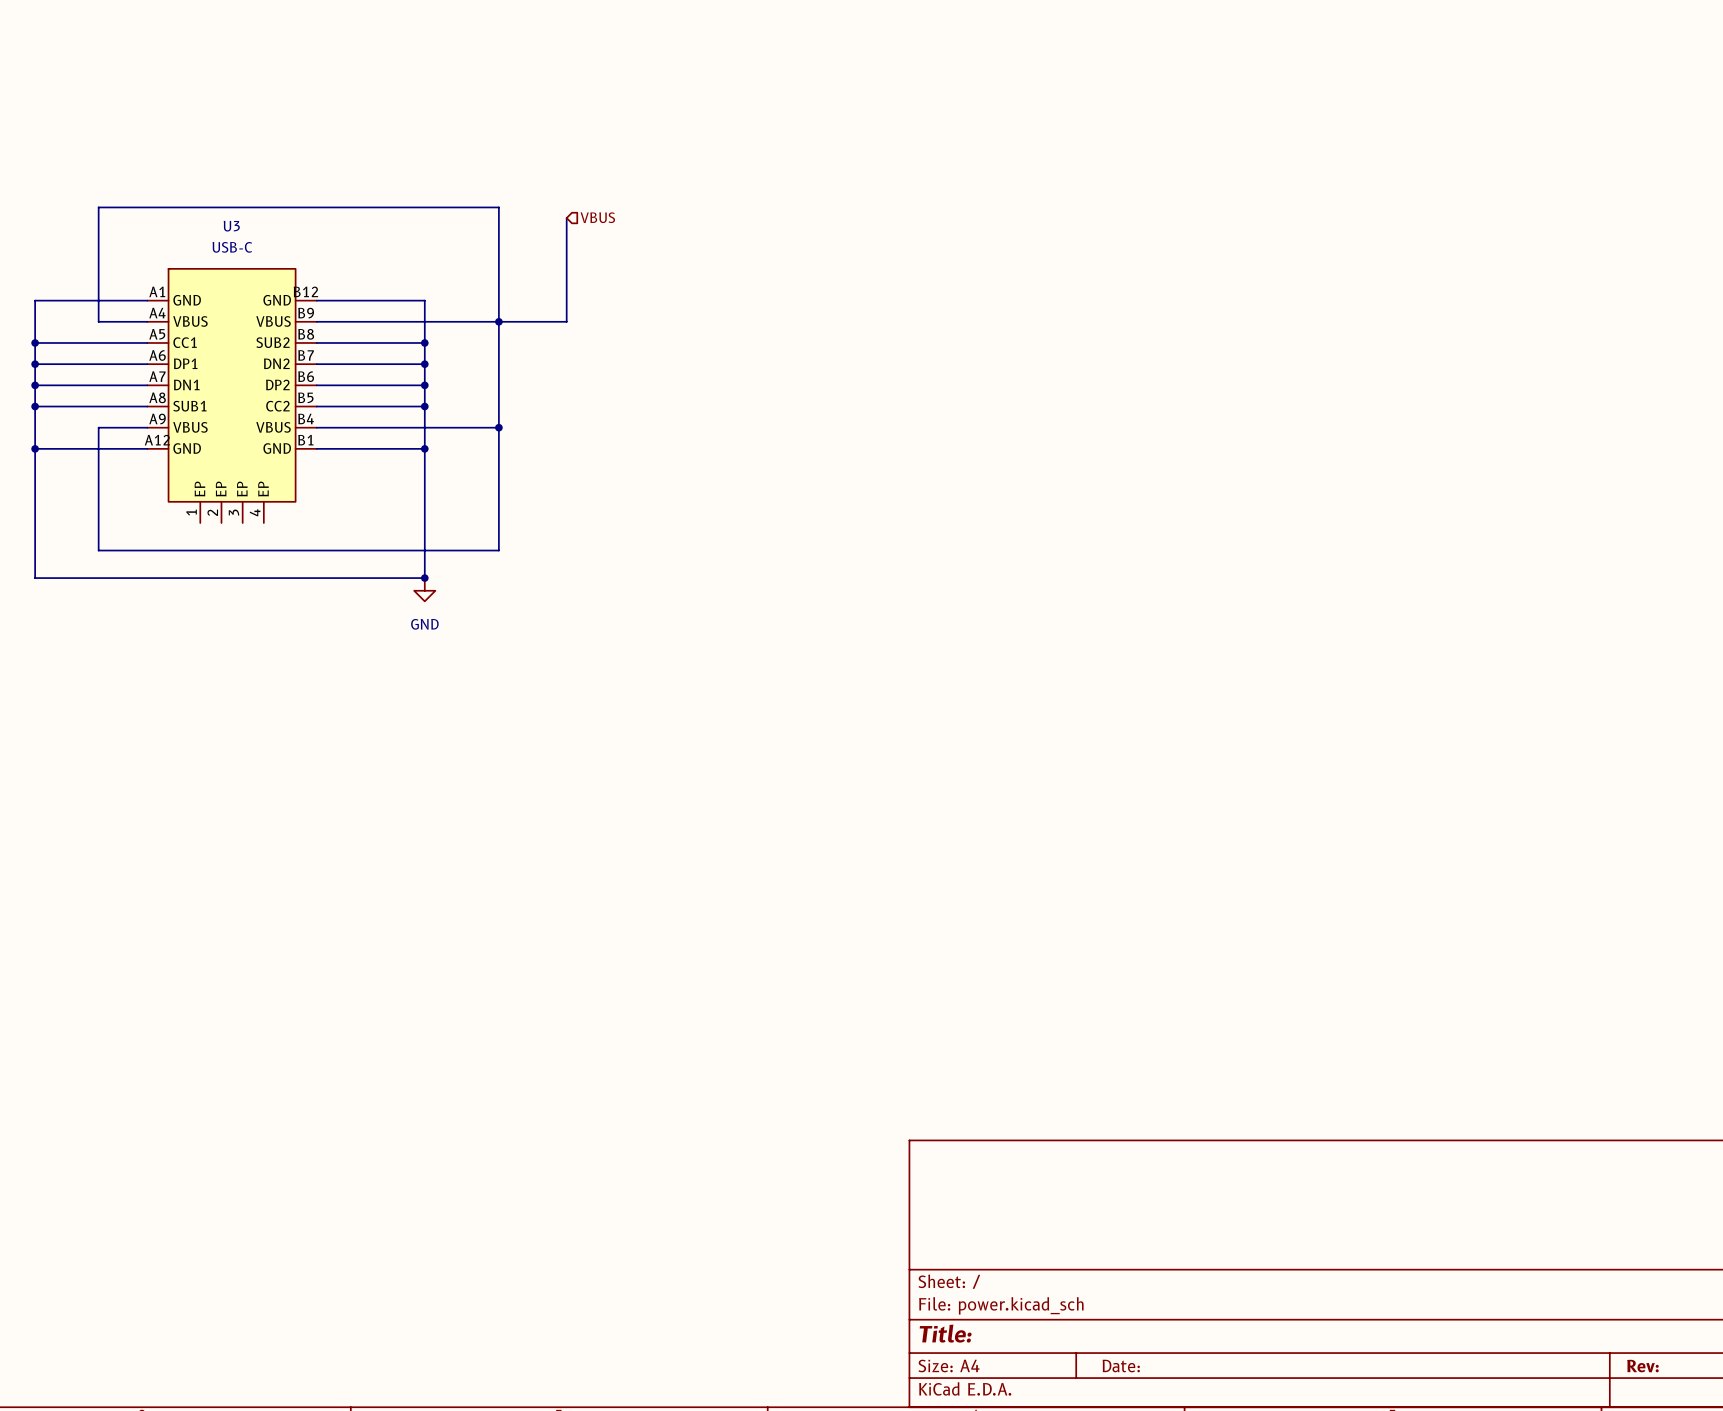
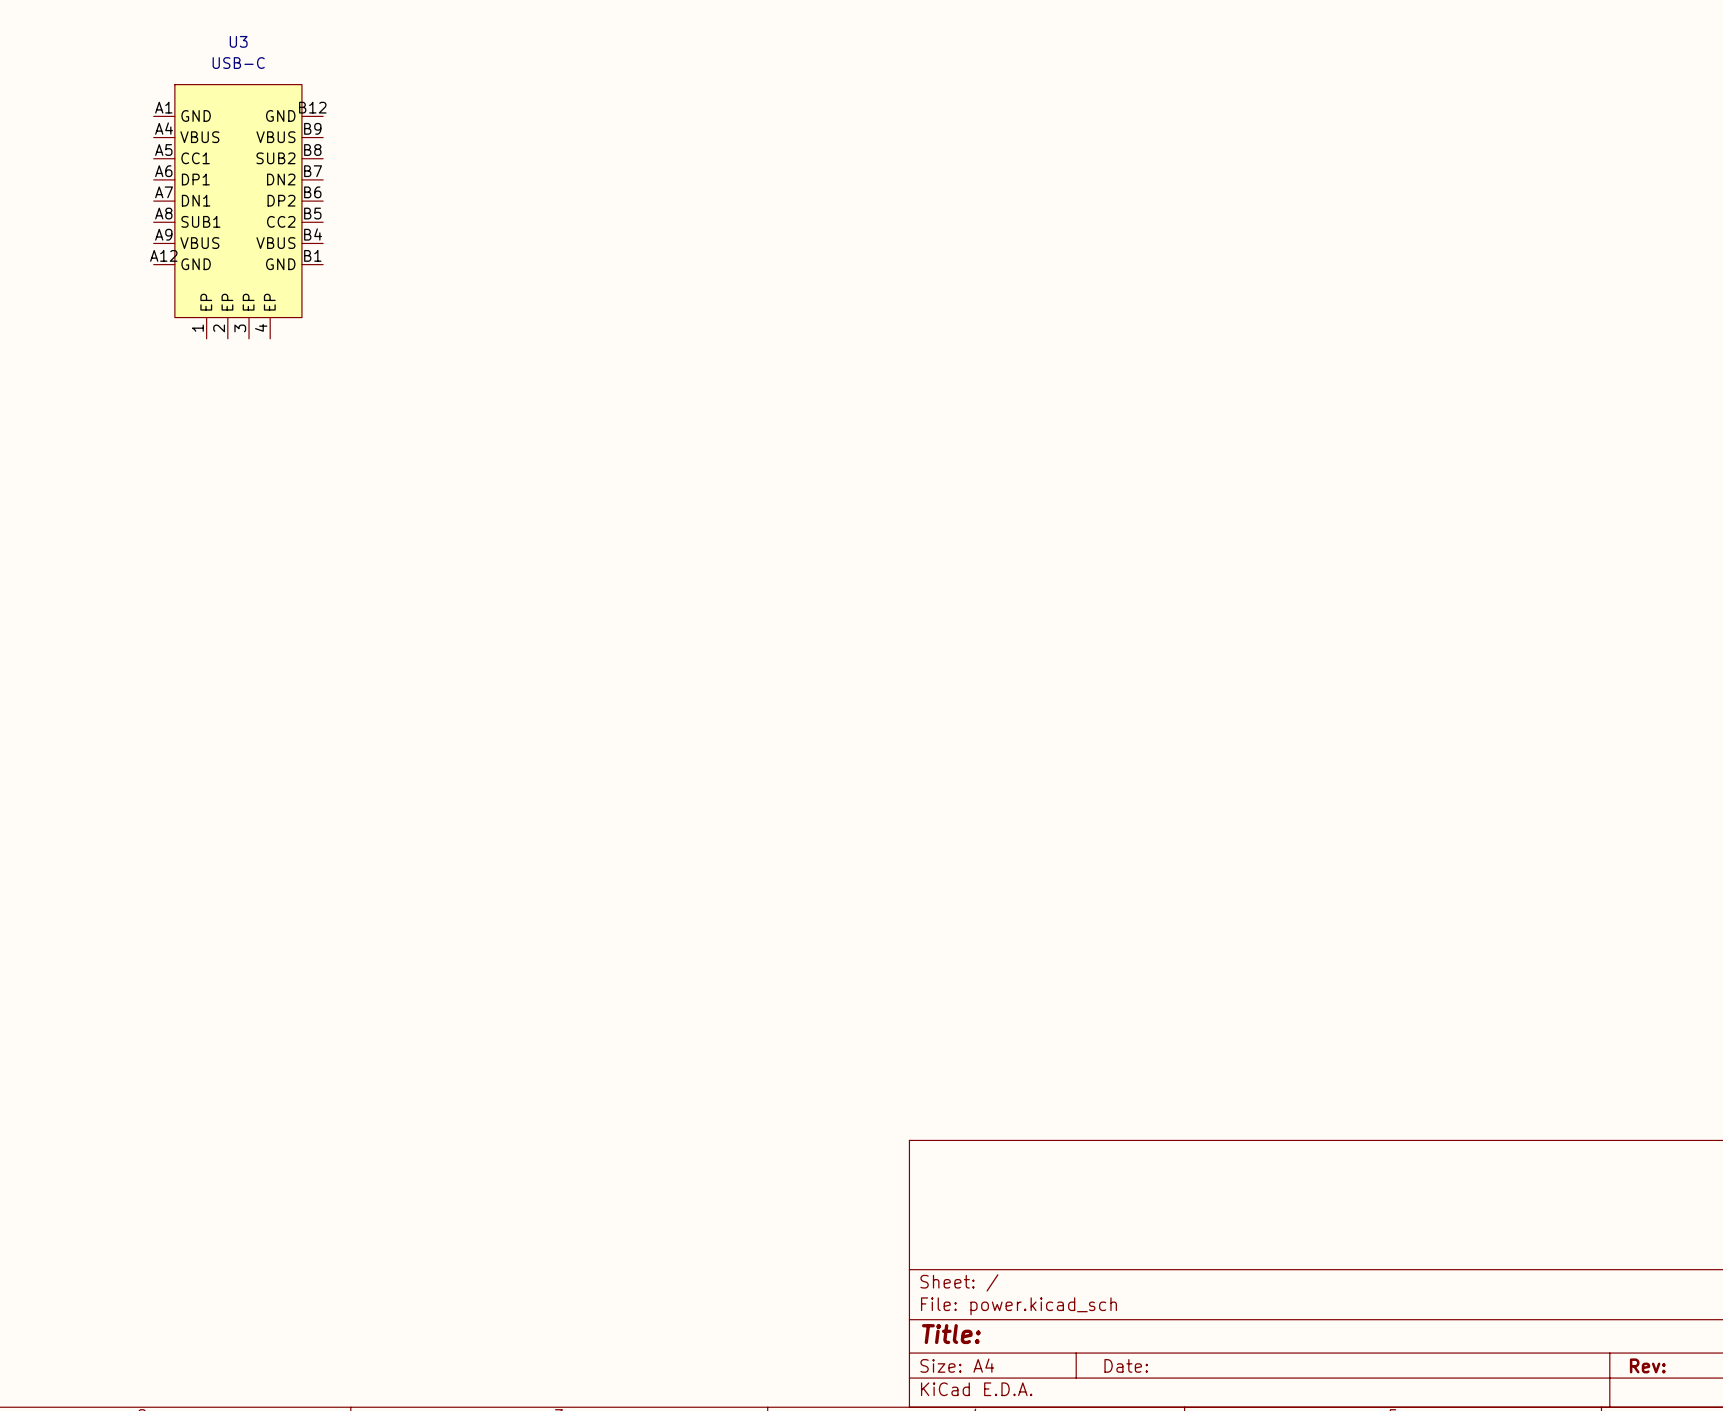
hierarchical label: VBUS (597, 217) -> none
wire: (566, 218) (566, 321) (316, 321) -> none
wire: (147, 300) (35, 300) (35, 578) (424, 578) -> none
wire: (316, 300) (424, 300) (424, 580) -> none
wire: (147, 321) (98, 321) (98, 207) (498, 207) (498, 550) (98, 550) (98, 427) (147, 427) -> none
junction: (498, 321) -> none
wire: (35, 342) (147, 342) -> none
junction: (35, 342) -> none
wire: (316, 342) (424, 342) -> none
junction: (424, 342) -> none
wire: (35, 364) (147, 364) -> none
junction: (35, 364) -> none
wire: (316, 364) (424, 364) -> none
junction: (424, 364) -> none
wire: (35, 385) (147, 385) -> none
junction: (35, 385) -> none
wire: (316, 385) (424, 385) -> none
junction: (424, 385) -> none
U3 position: (232, 395) -> (238, 211)
wire: (35, 406) (147, 406) -> none
junction: (35, 406) -> none
wire: (316, 406) (424, 406) -> none
junction: (424, 406) -> none
wire: (316, 427) (498, 427) -> none
junction: (498, 427) -> none
wire: (35, 448) (147, 448) -> none
junction: (35, 448) -> none
wire: (316, 448) (424, 448) -> none
junction: (424, 448) -> none
junction: (424, 578) -> none
power symbol: GND (424, 590) -> none

